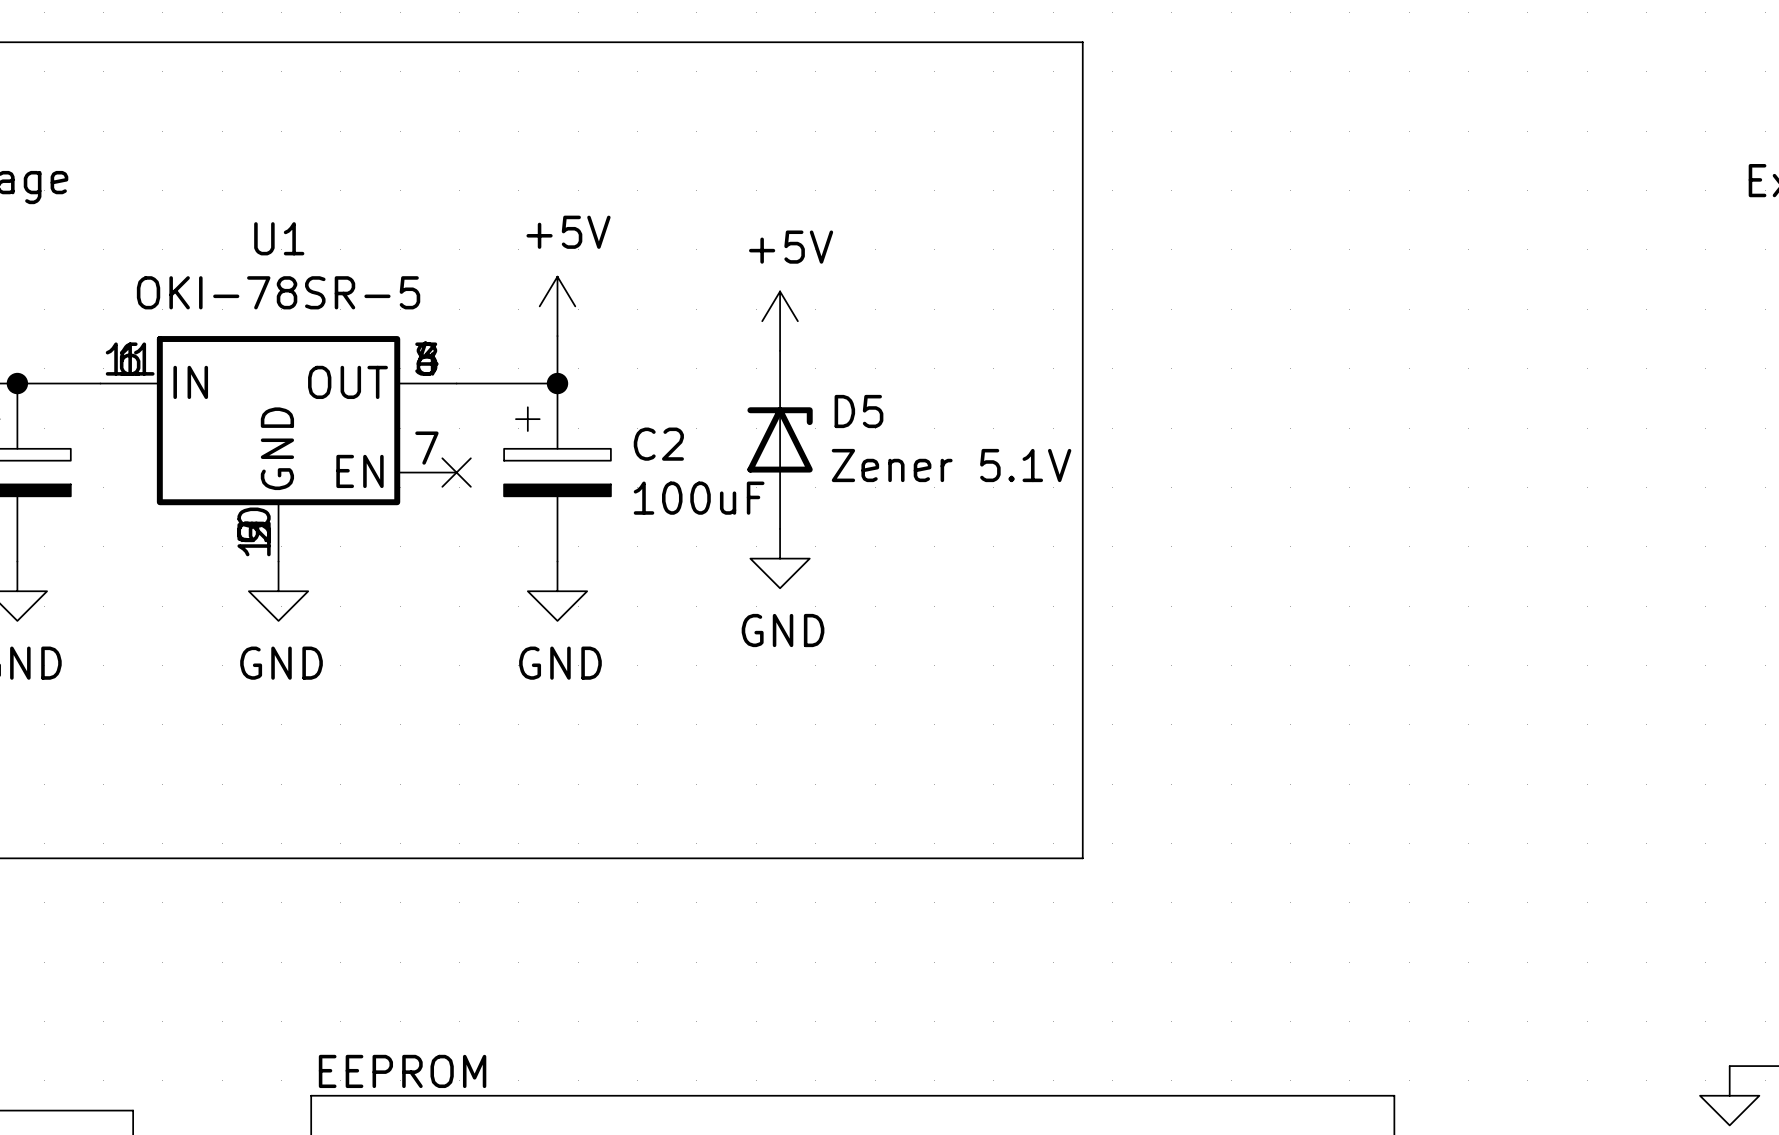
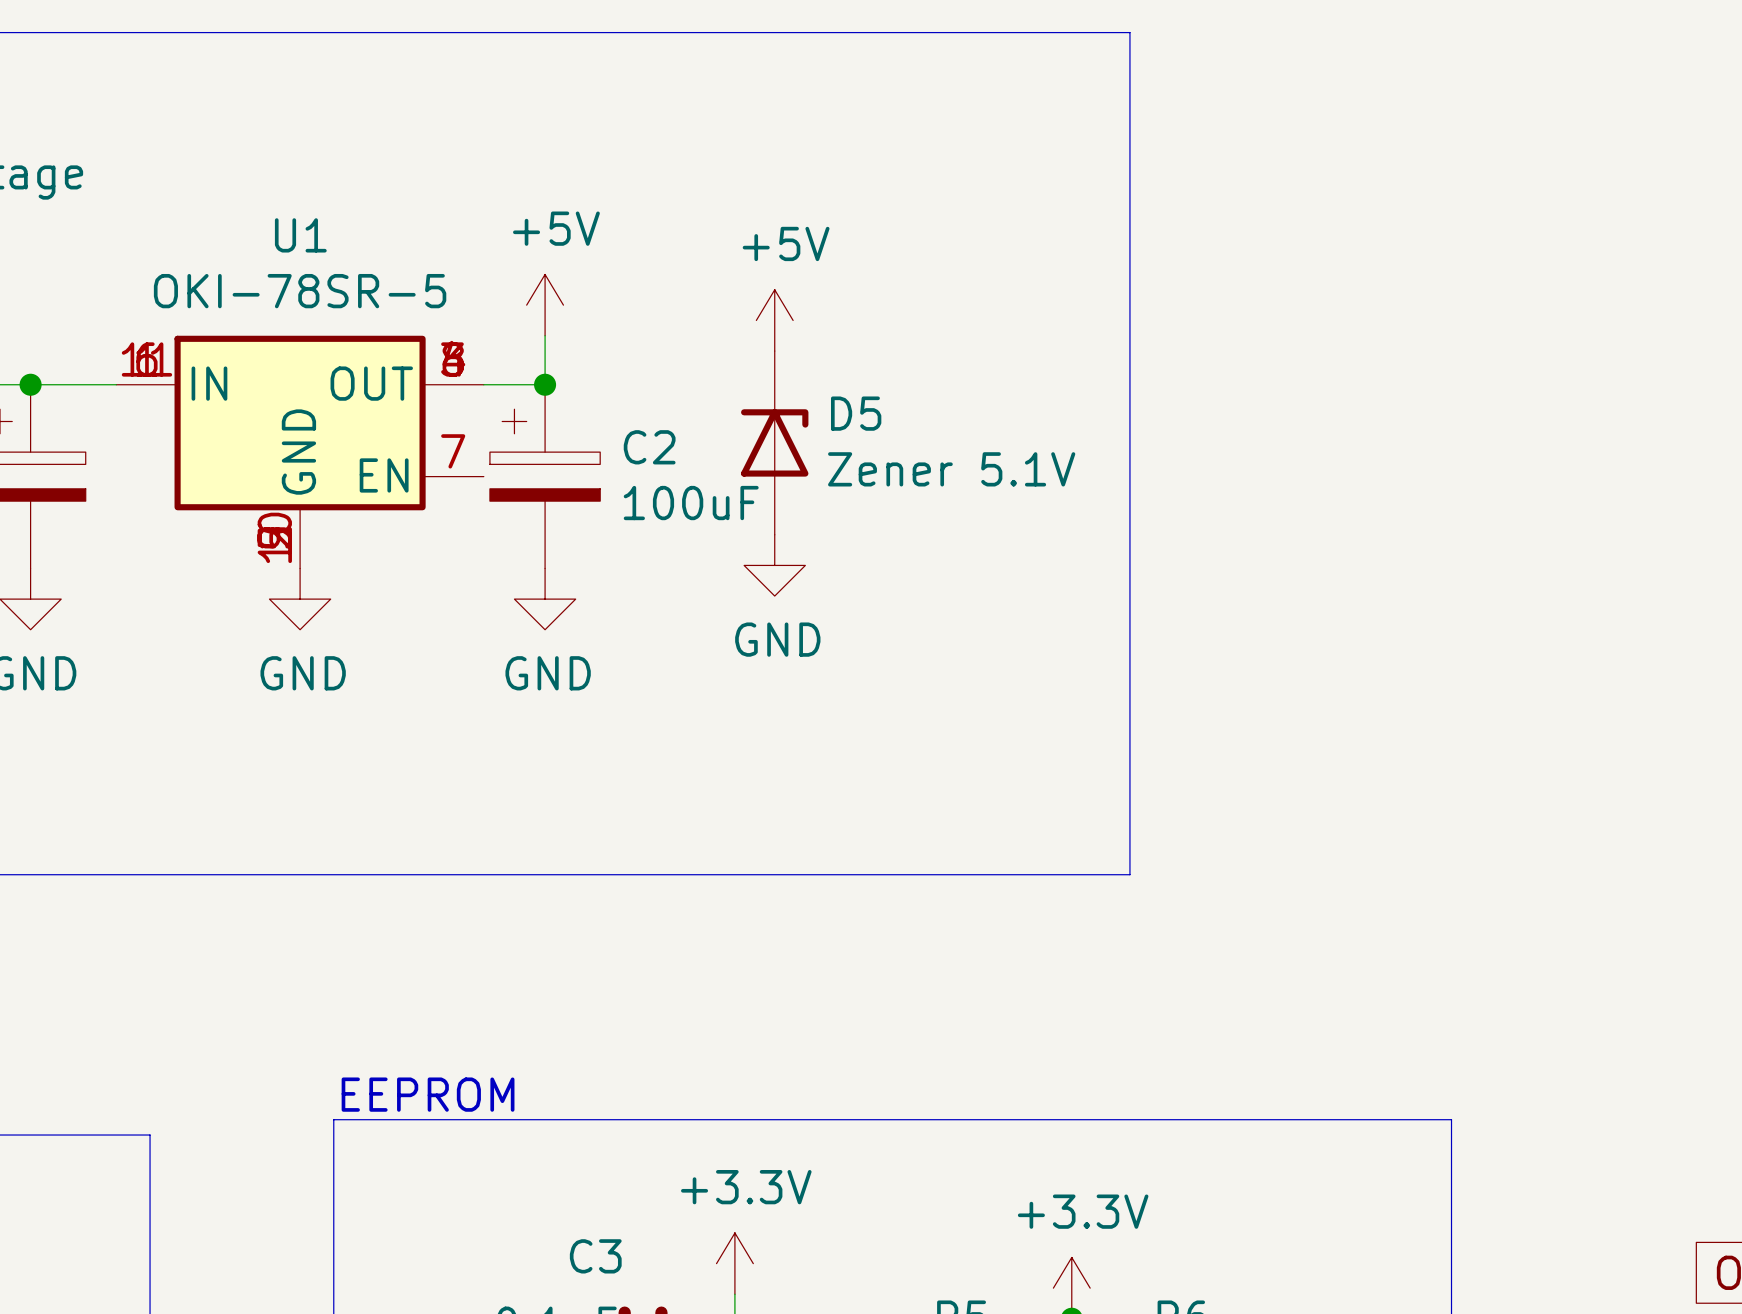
power symbol position: +5V (557, 306) -> +5V (545, 305)
power symbol position: +5V (780, 321) -> +5V (774, 320)
wire: (557, 336) (557, 383) (515, 383) -> (545, 335) (545, 384)
junction position: (557, 383) -> (545, 384)
D5 position: (780, 439) -> (774, 442)
no-connect mark: (456, 472) -> none
C2 position: (557, 472) -> (545, 476)
power symbol position: GND (780, 558) -> GND (774, 565)
power symbol position: GND (557, 591) -> GND (545, 599)

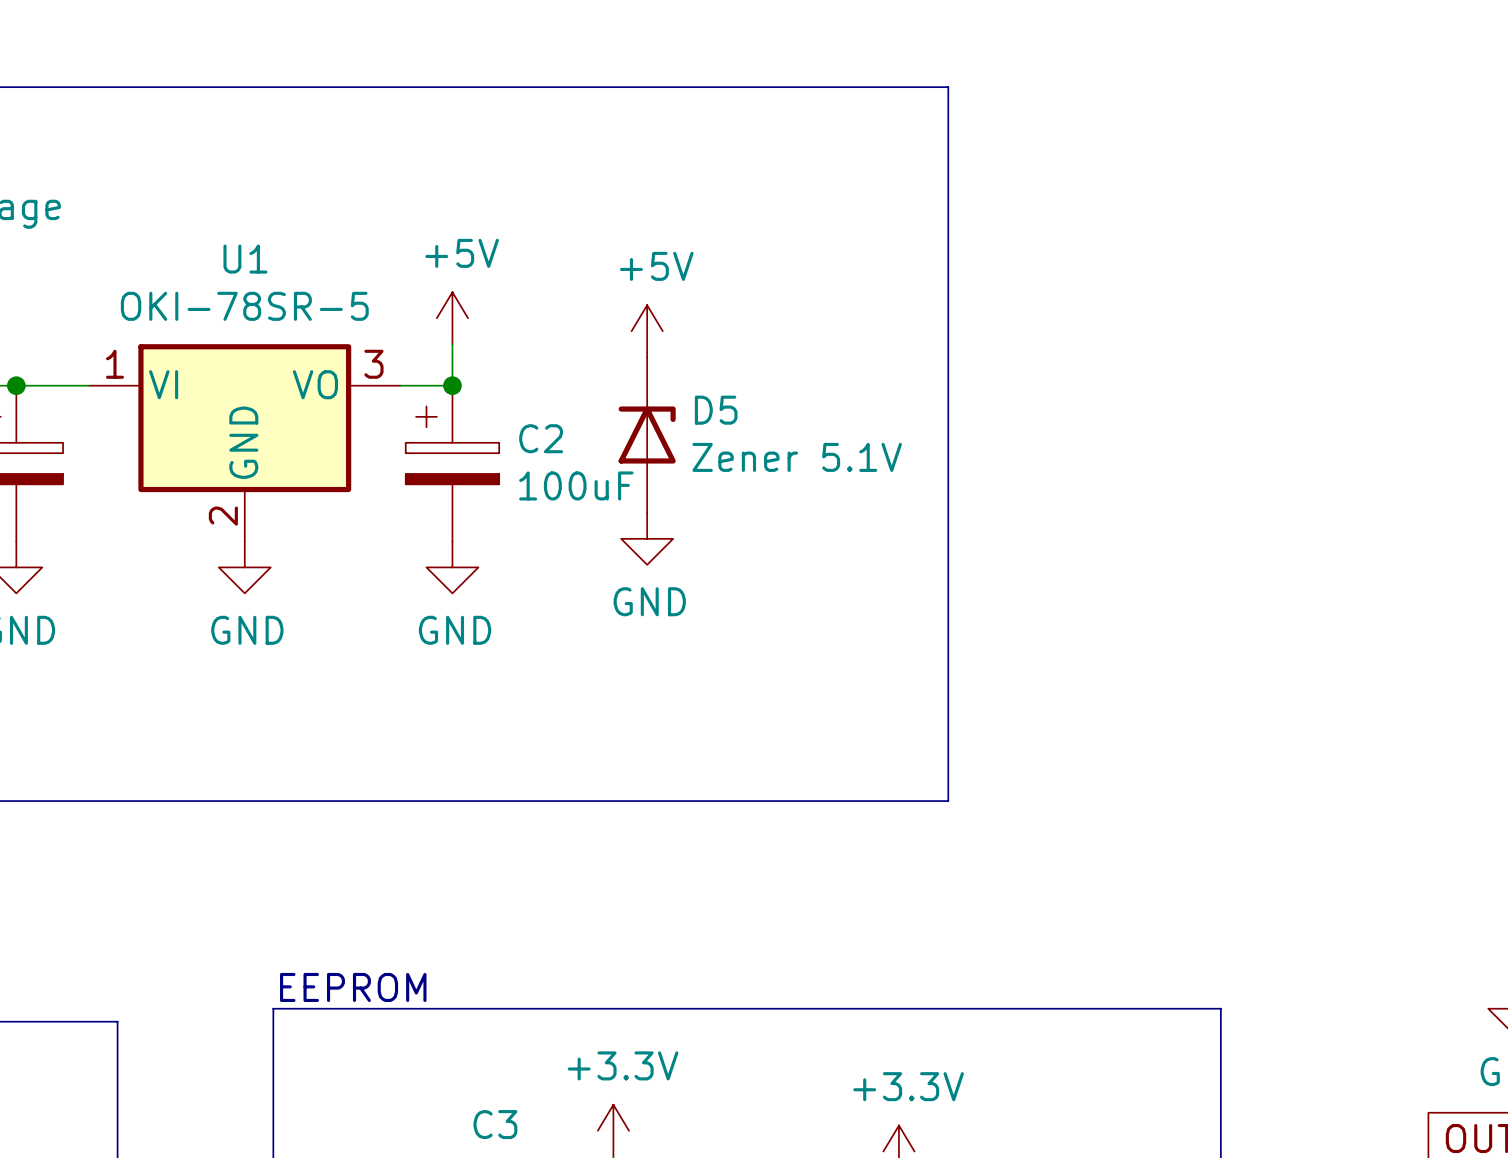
U1 symbol: [116, 335, 484, 569] -> [89, 344, 401, 542]

